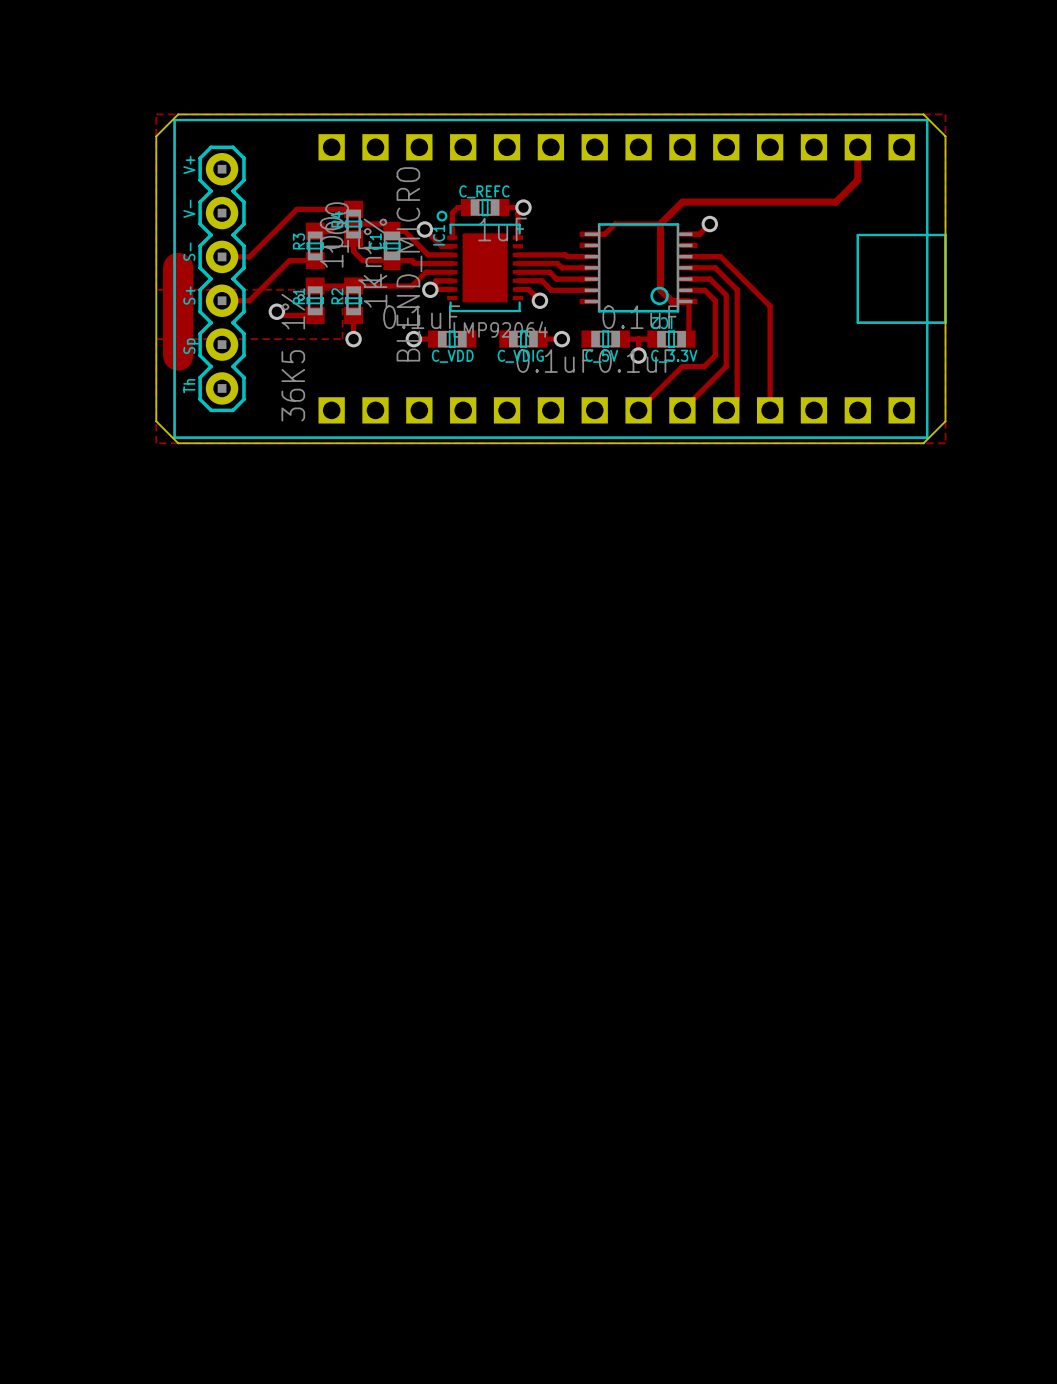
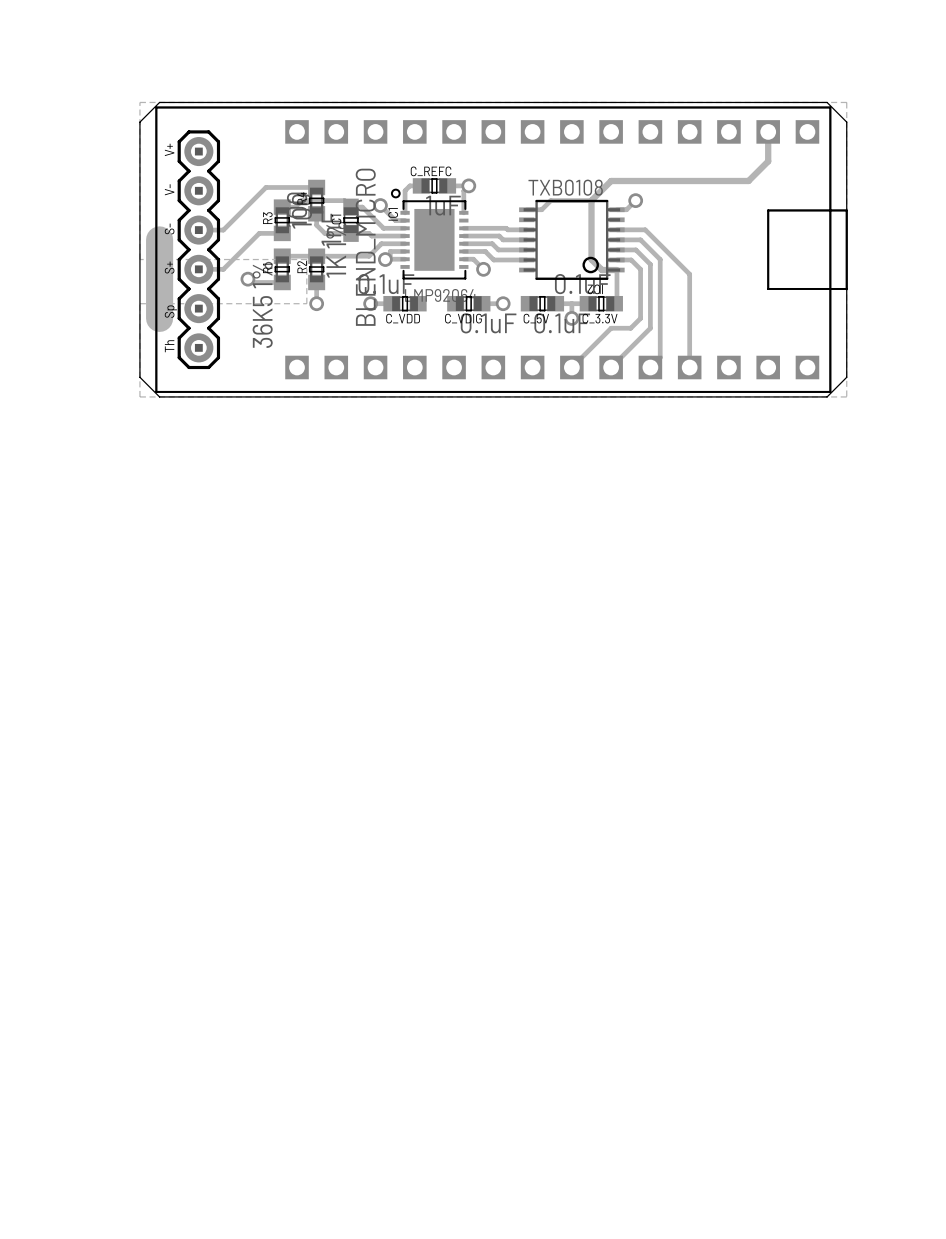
IC2 value: none -> TXB0108 (565, 187)

